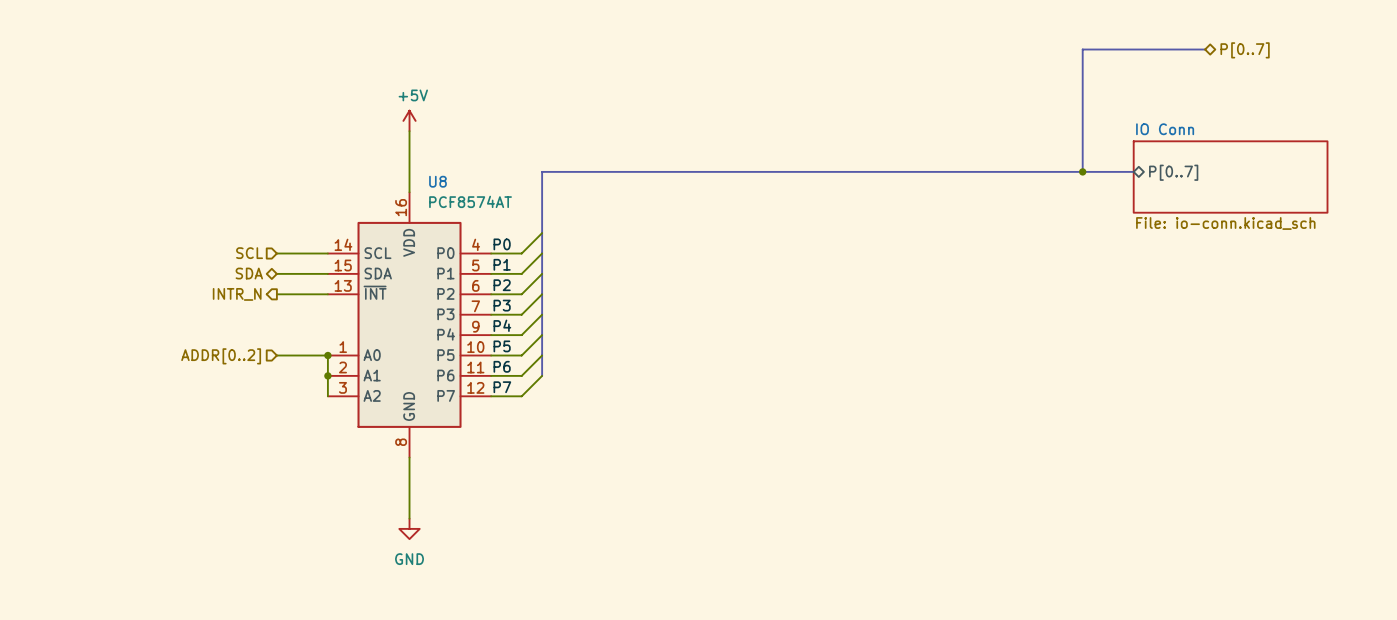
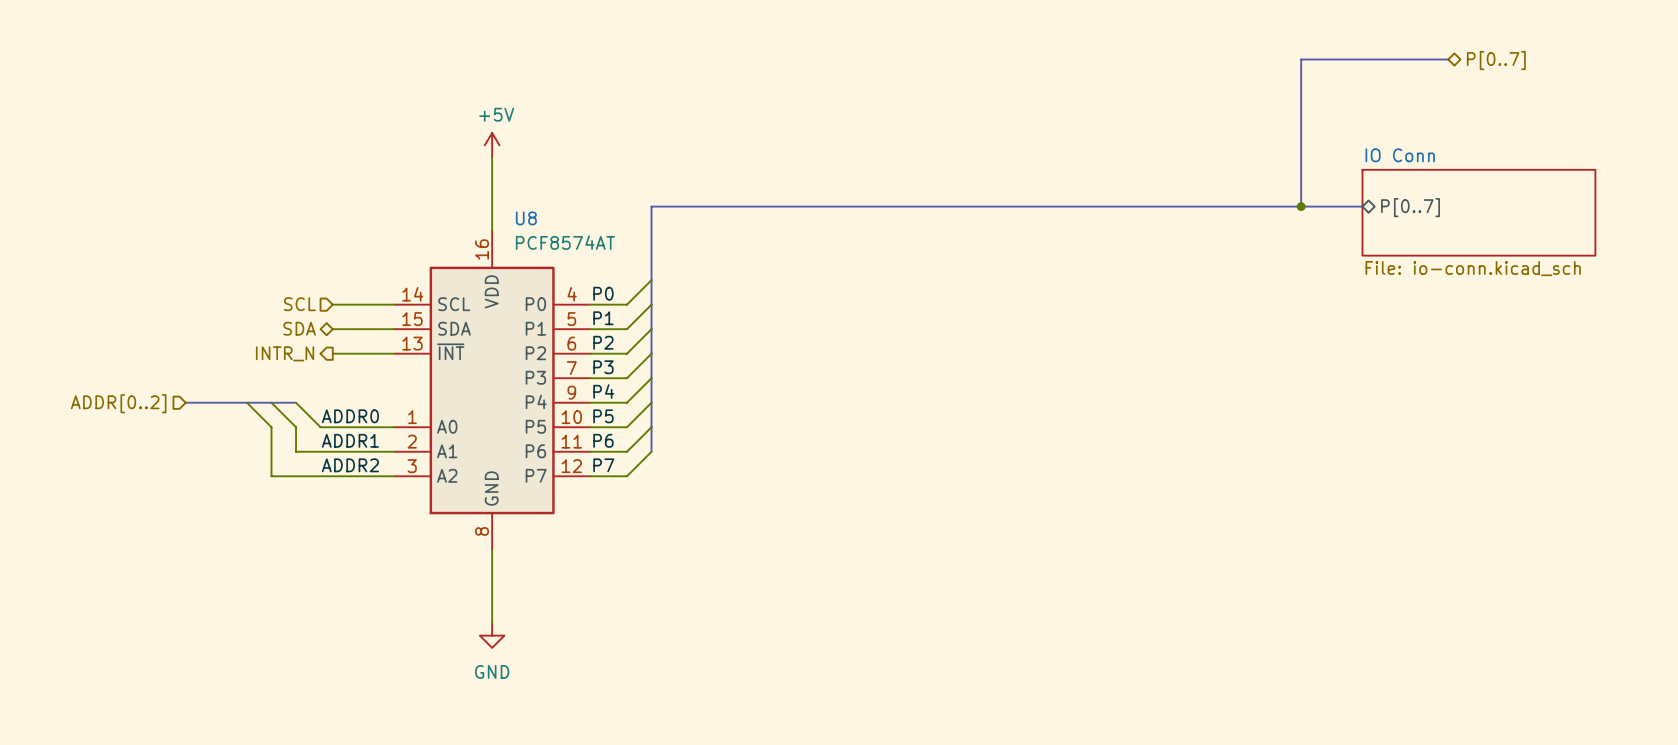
bus: none -> (185, 402) (296, 402)
wire: none -> (271, 402) (296, 427) (296, 451) (394, 451)
wire: none -> (296, 402) (320, 427) (332, 427)
label: none -> ADDR0 (350, 416)
wire: (327, 355) (327, 396) -> (246, 402) (271, 427) (271, 476) (394, 476)
junction: (327, 355) -> none
hierarchical label position: ADDR[0..2] (221, 356) -> ADDR[0..2] (118, 403)
label: none -> ADDR1 (350, 440)
junction: (327, 375) -> none
label: none -> ADDR2 (350, 465)

